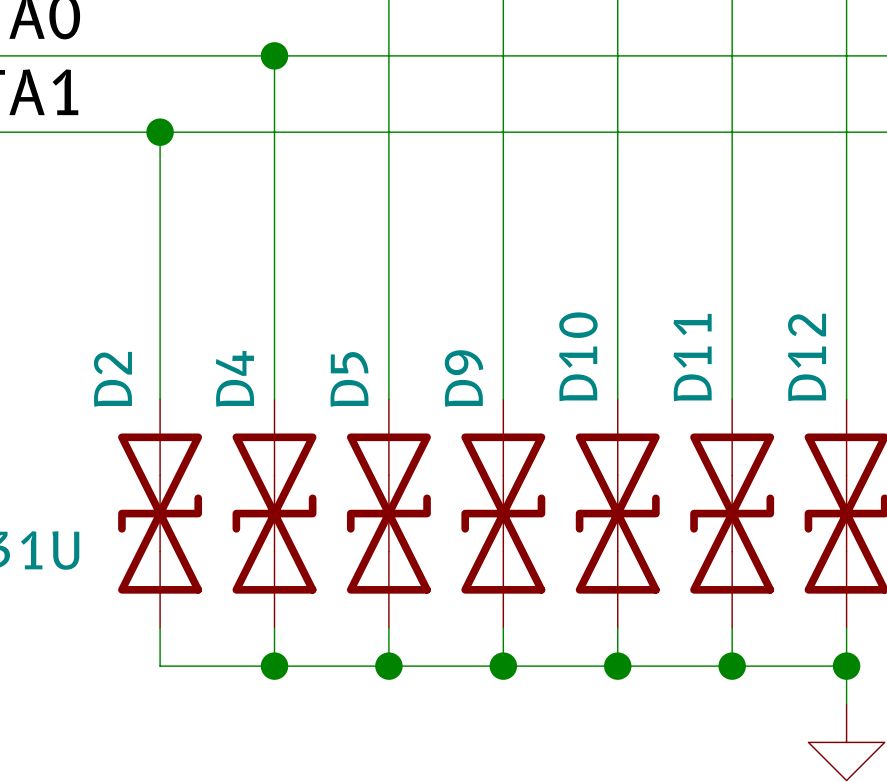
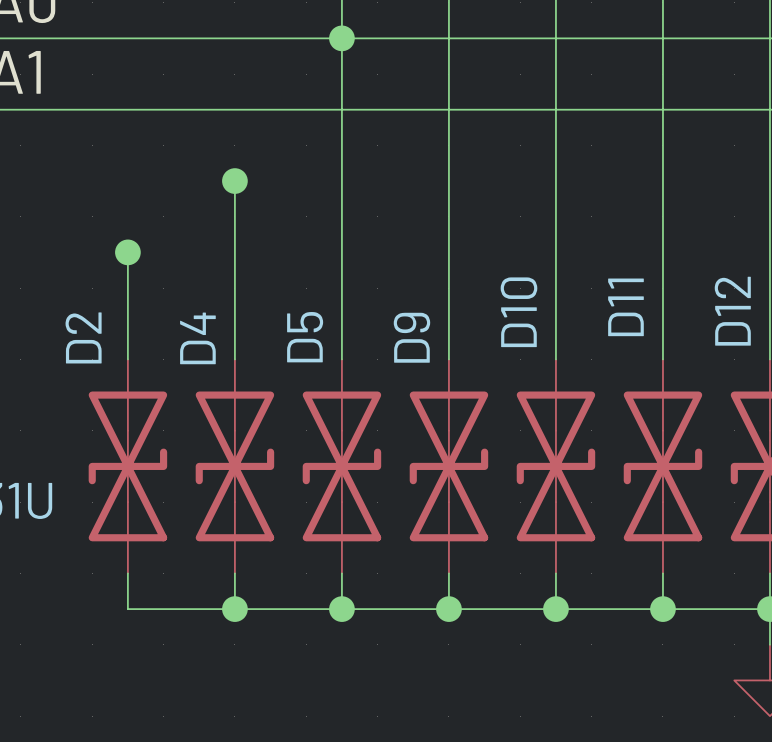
wire: (274, 55) (274, 208) -> none
junction: (274, 55) -> none
junction: none -> (341, 38)
wire: (160, 132) (160, 284) -> none
junction: (160, 132) -> none
junction: none -> (234, 181)
junction: none -> (127, 252)

